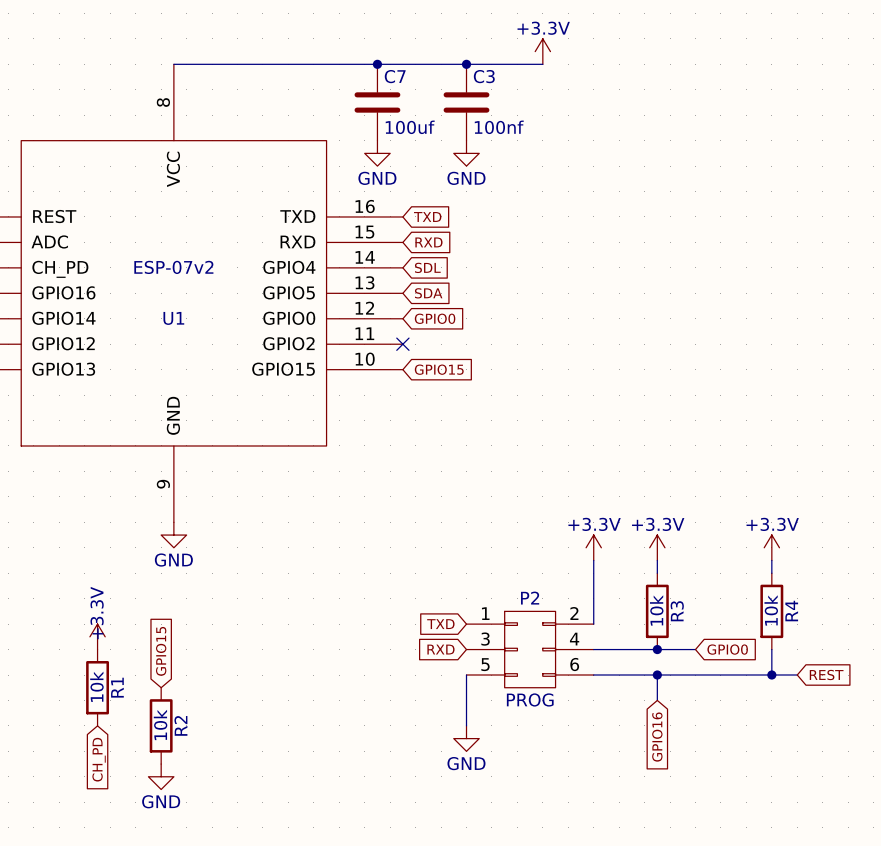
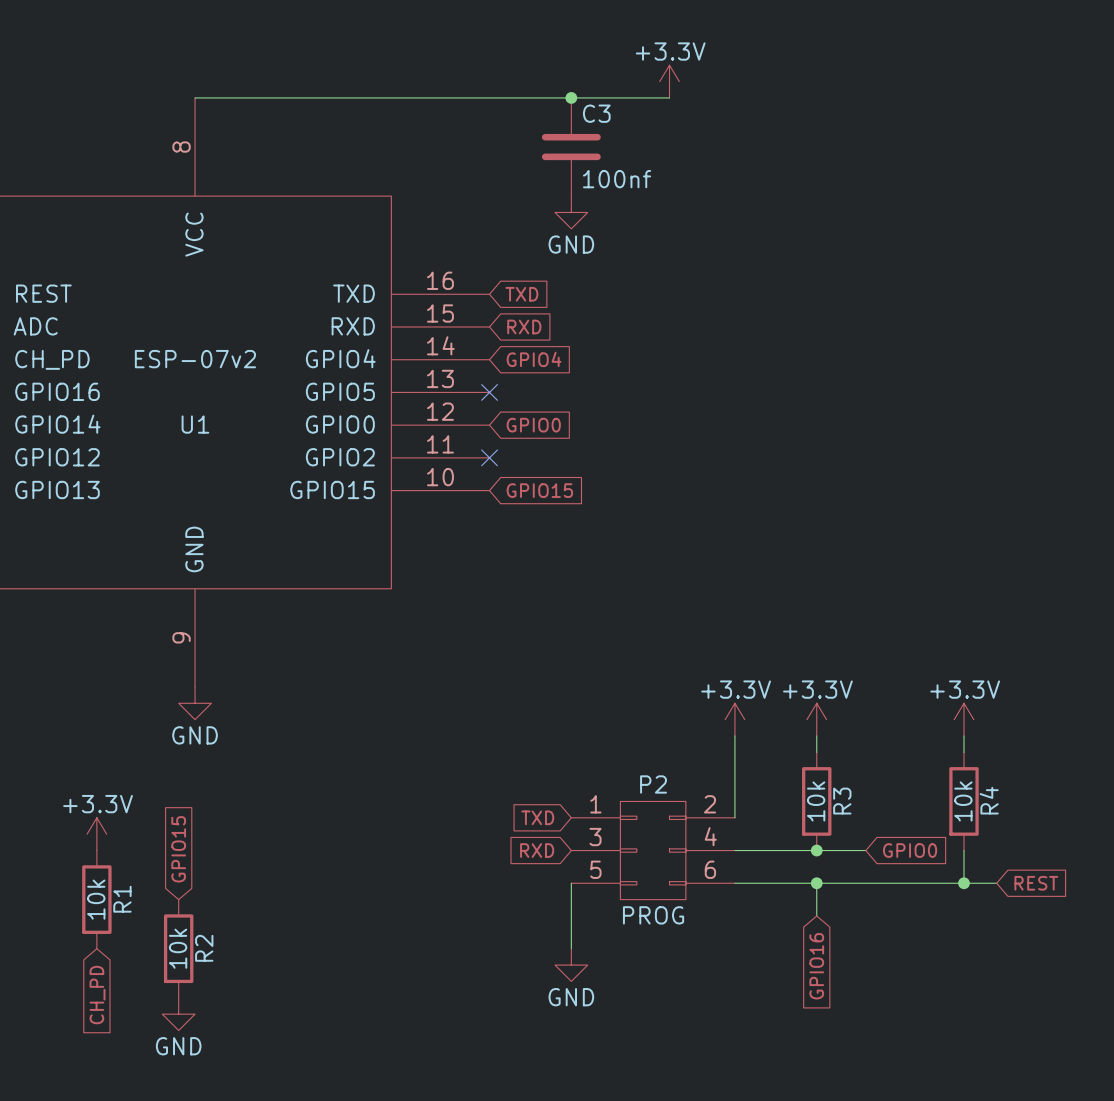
junction: (377, 64) -> none
C7: 100uf (377, 102) -> none
power symbol: GND (377, 153) -> none
global label: SDL (427, 267) -> GPIO4 (534, 359)
no-connect mark: none -> (489, 392)
global label: SDA (428, 293) -> none
power symbol text rotation: 0° (97, 613) -> 90° clockwise (98, 804)

